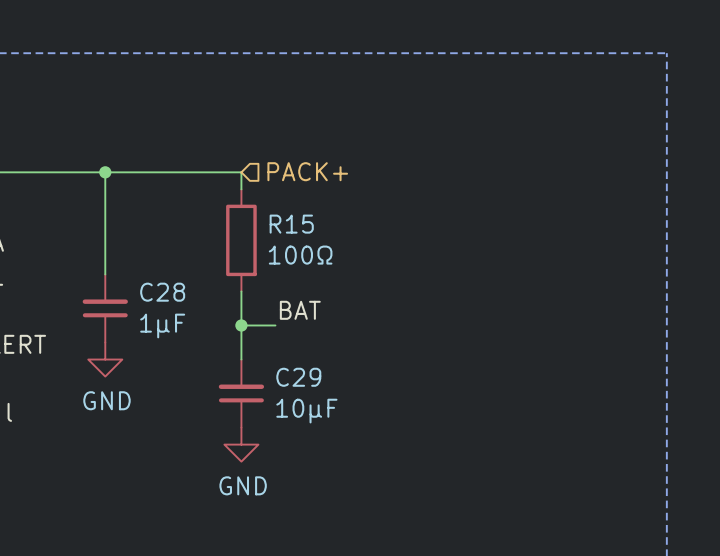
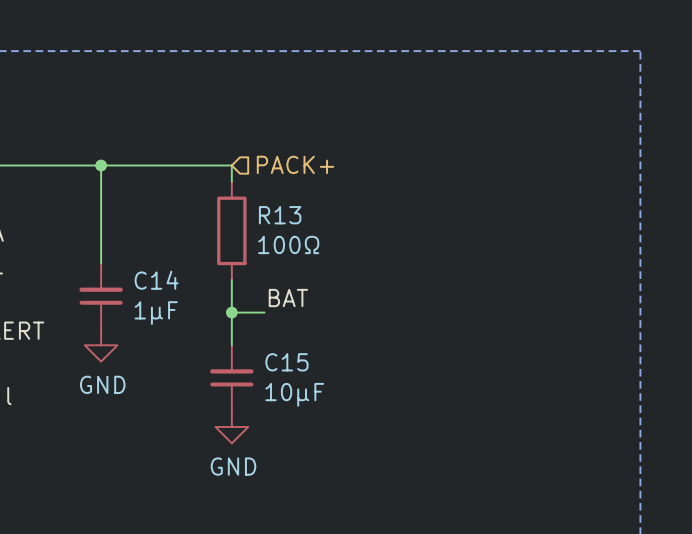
R15 name: R15 (291, 224) -> R13 (280, 215)
C28 name: C28 (162, 292) -> C14 (156, 280)
C29 name: C29 (298, 377) -> C15 (286, 362)

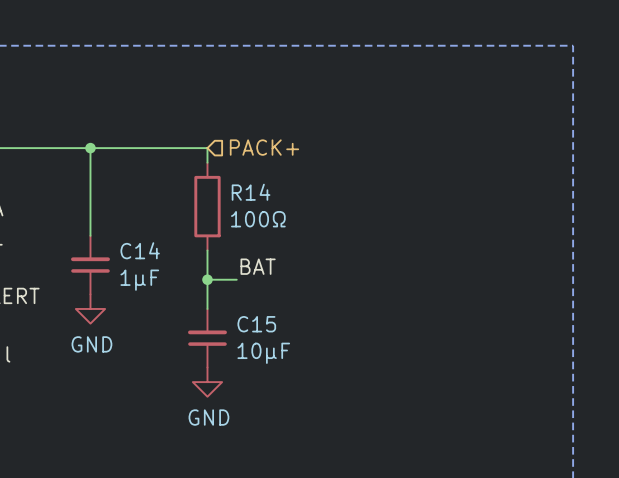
R13 name: R13 (280, 215) -> R14 (251, 192)

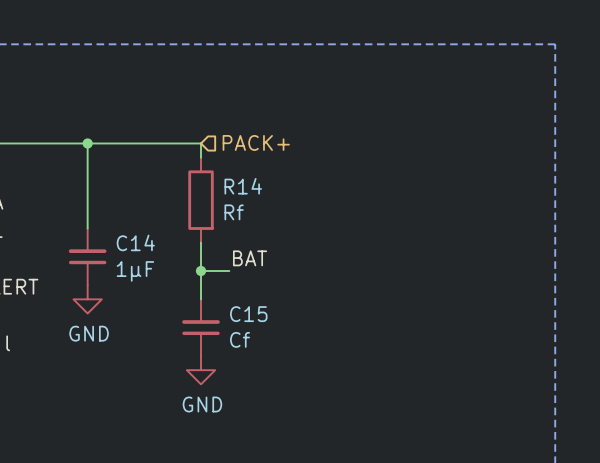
R14 value: 100Ω (258, 219) -> Rf (234, 212)
C15 value: 10μF (263, 353) -> Cf (240, 339)

